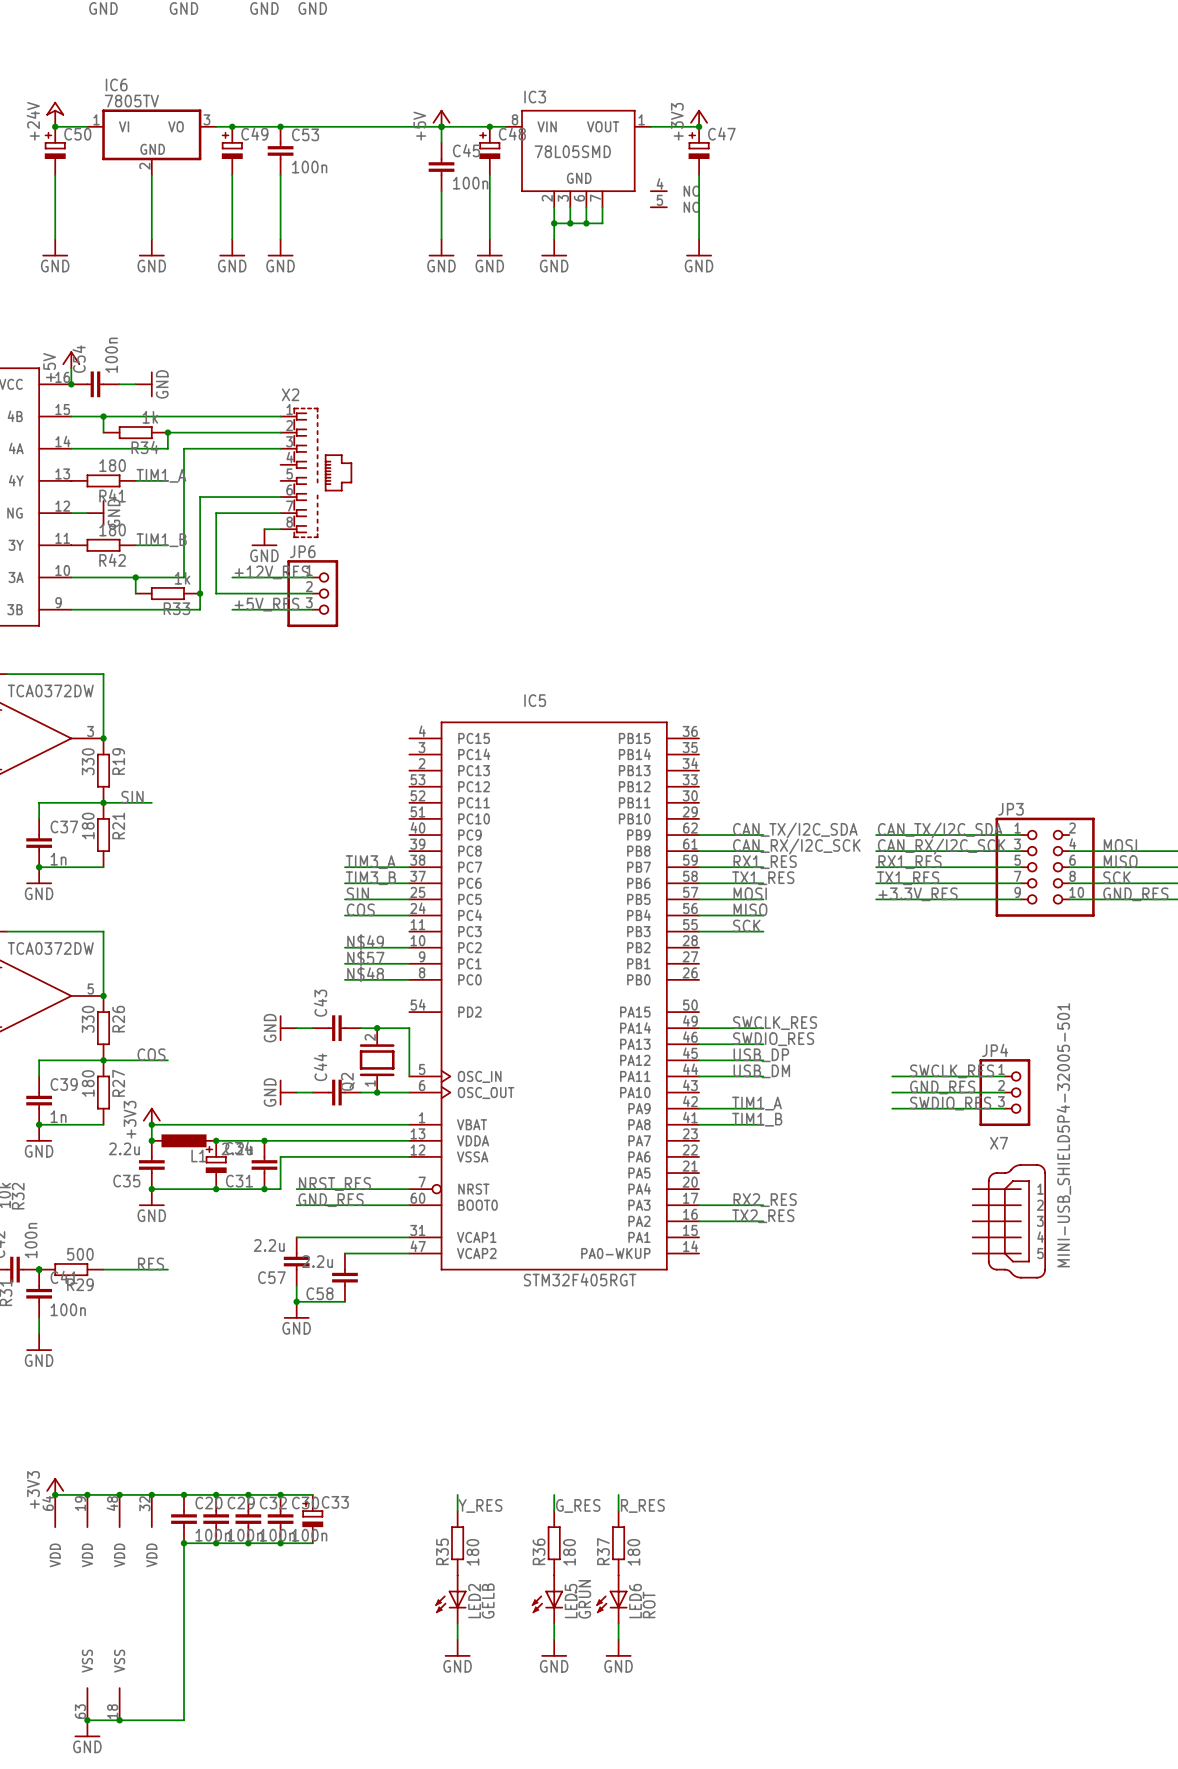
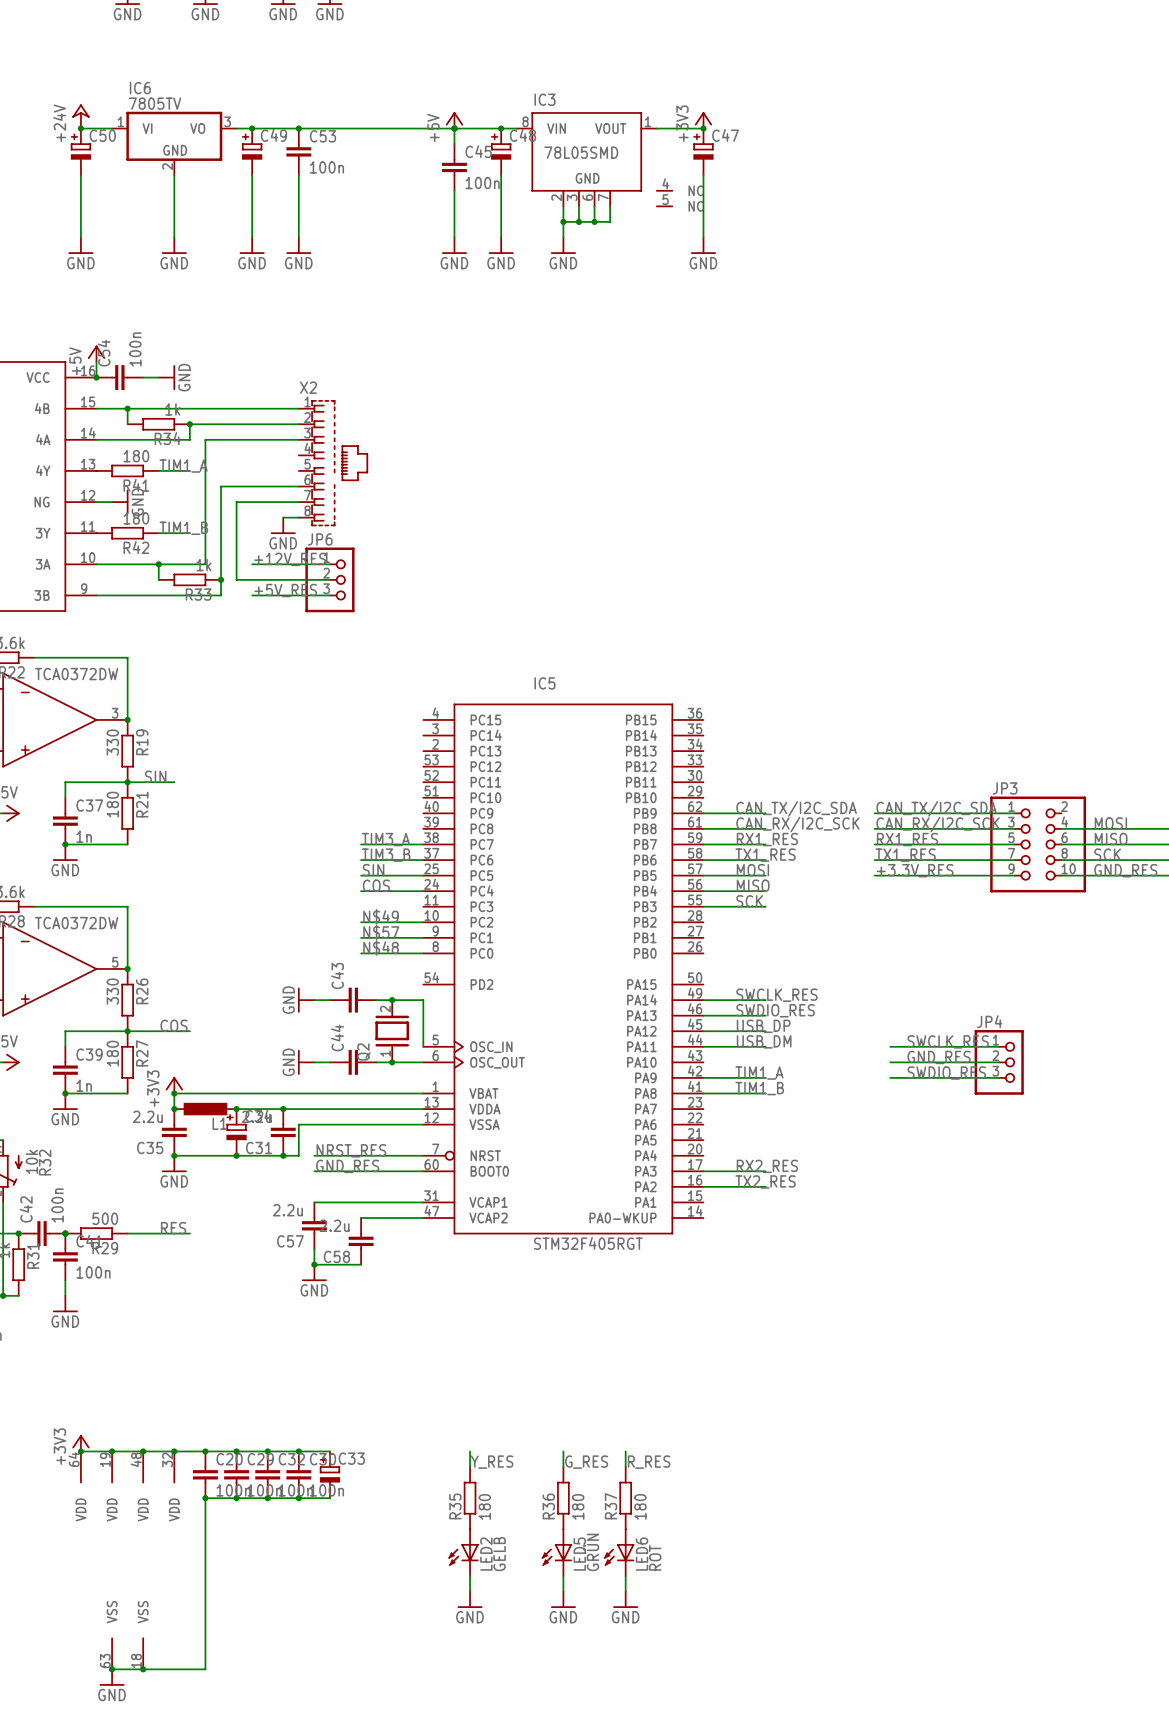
X7: MINI-USB_SHIELD5P4-32005-501 (1009, 1221) -> none

